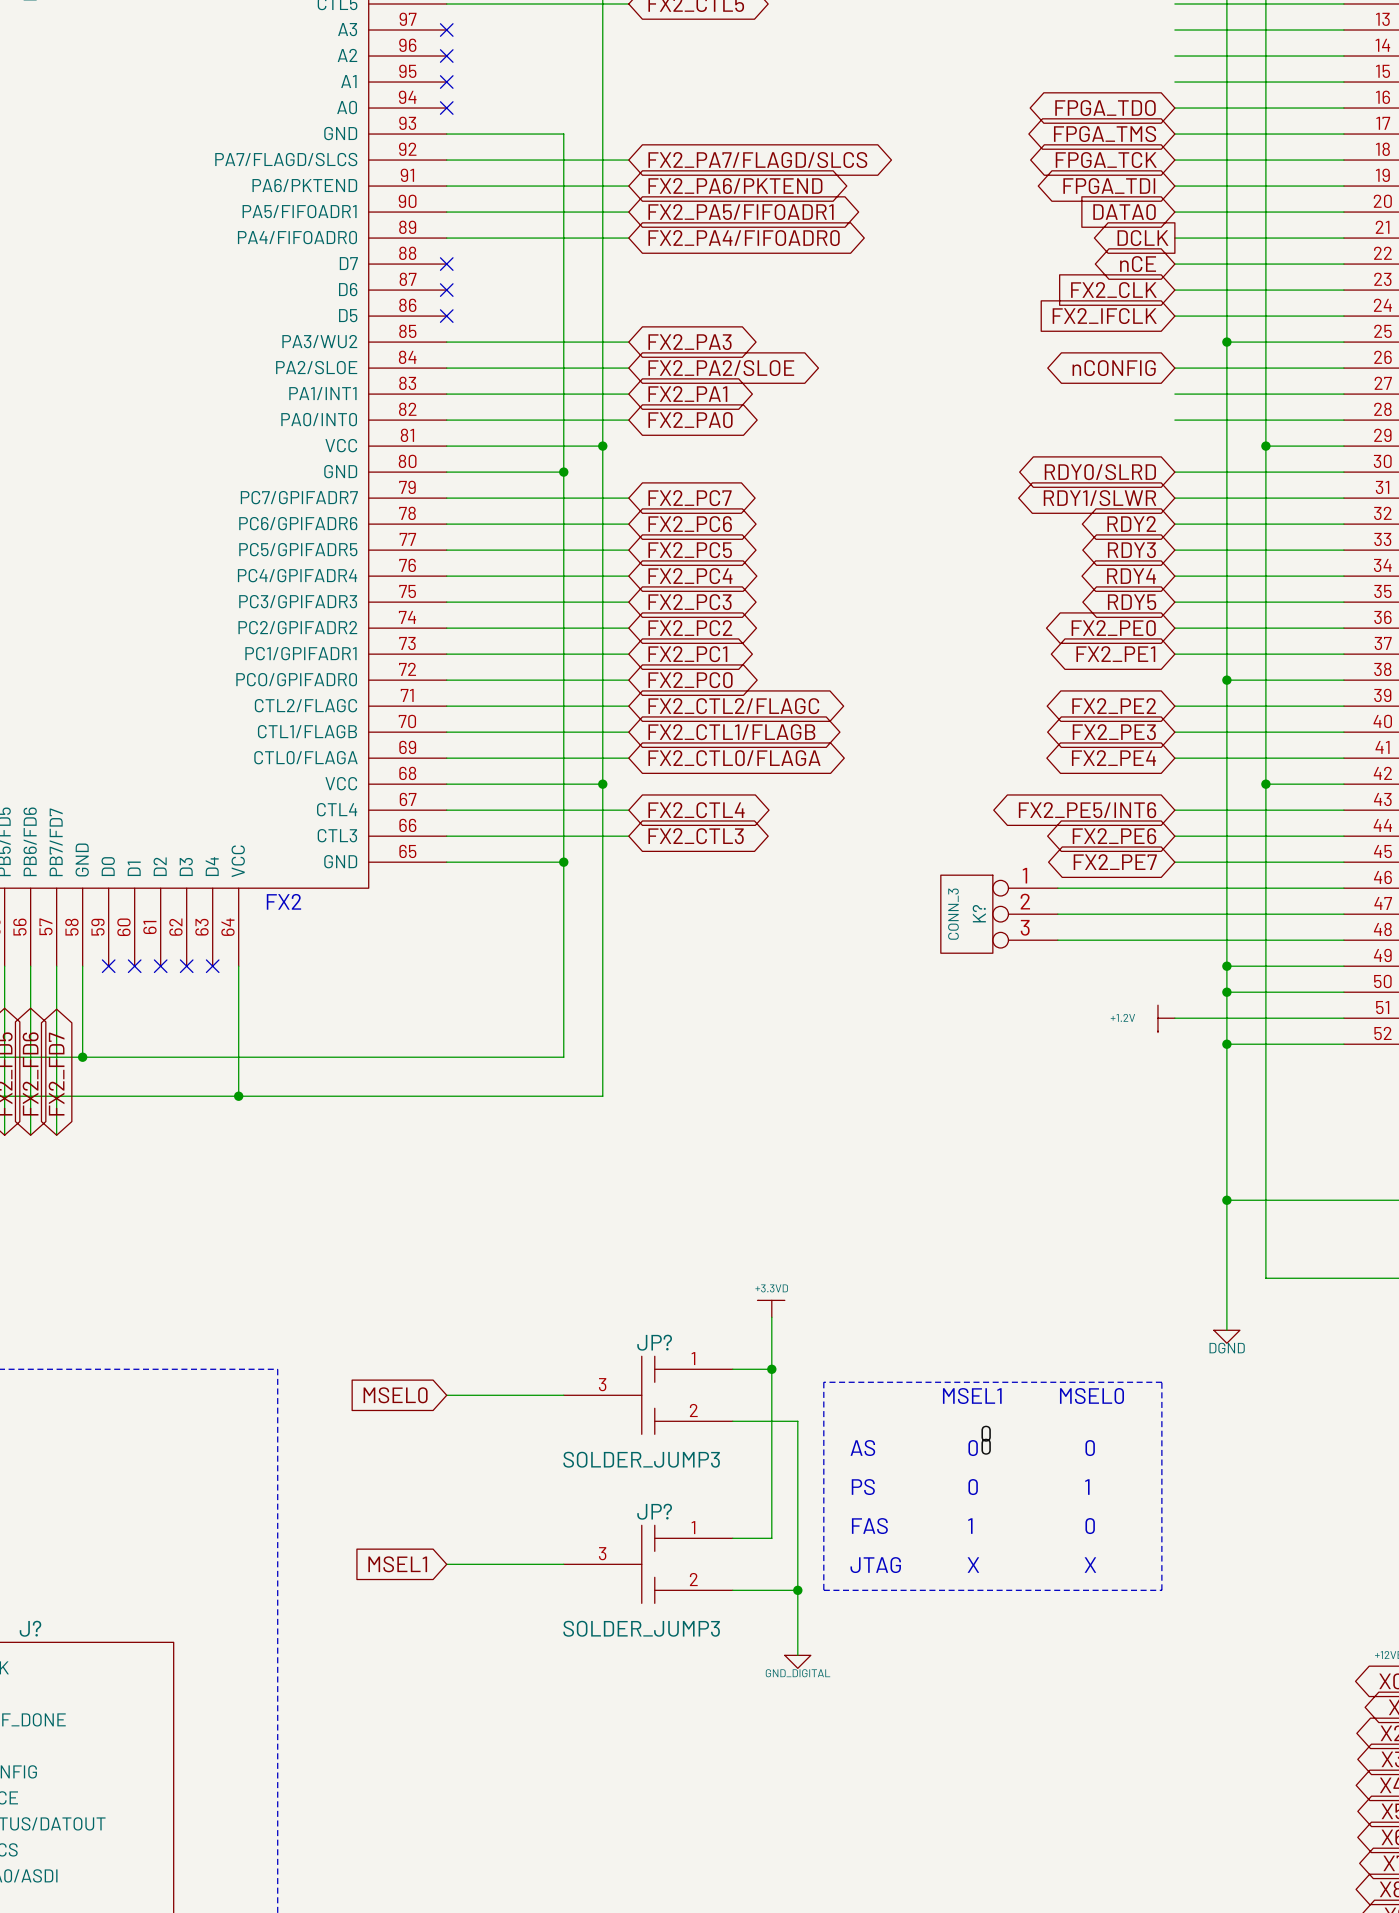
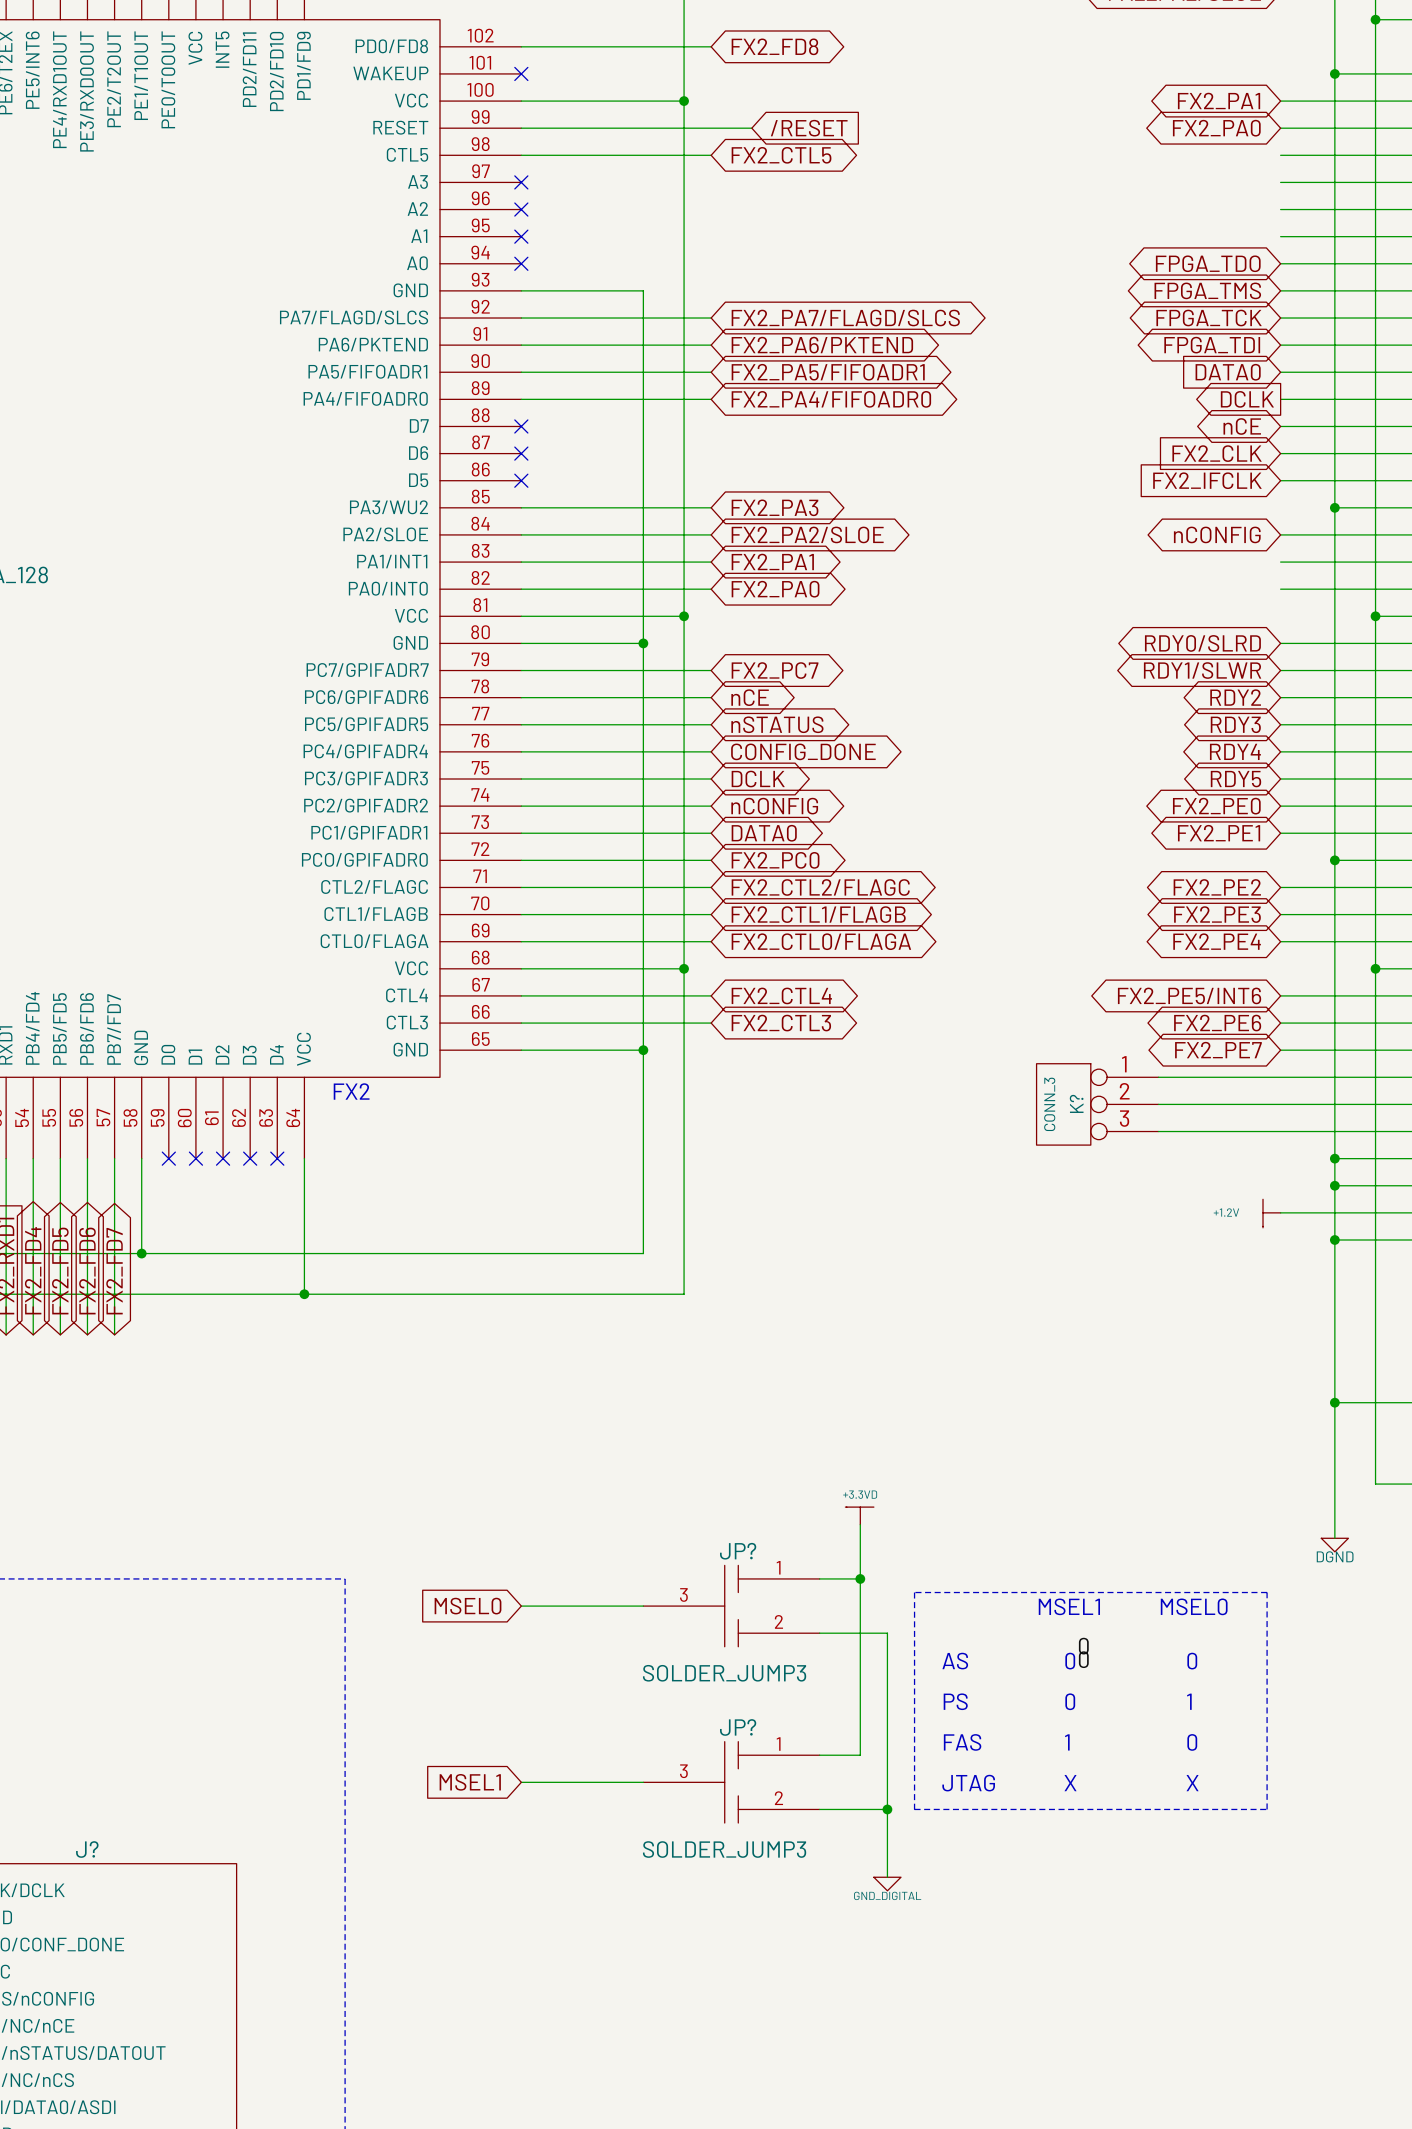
global label: FX2_PC6 (690, 524) -> nCE (750, 697)
global label: FX2_PC5 (690, 550) -> nSTATUS (777, 724)
global label: FX2_PC4 (690, 576) -> CONFIG_DONE (803, 751)
global label: FX2_PC3 (690, 602) -> DCLK (758, 779)
global label: FX2_PC2 (690, 628) -> nCONFIG (774, 806)
global label: FX2_PC1 (687, 654) -> DATA0 (764, 833)

